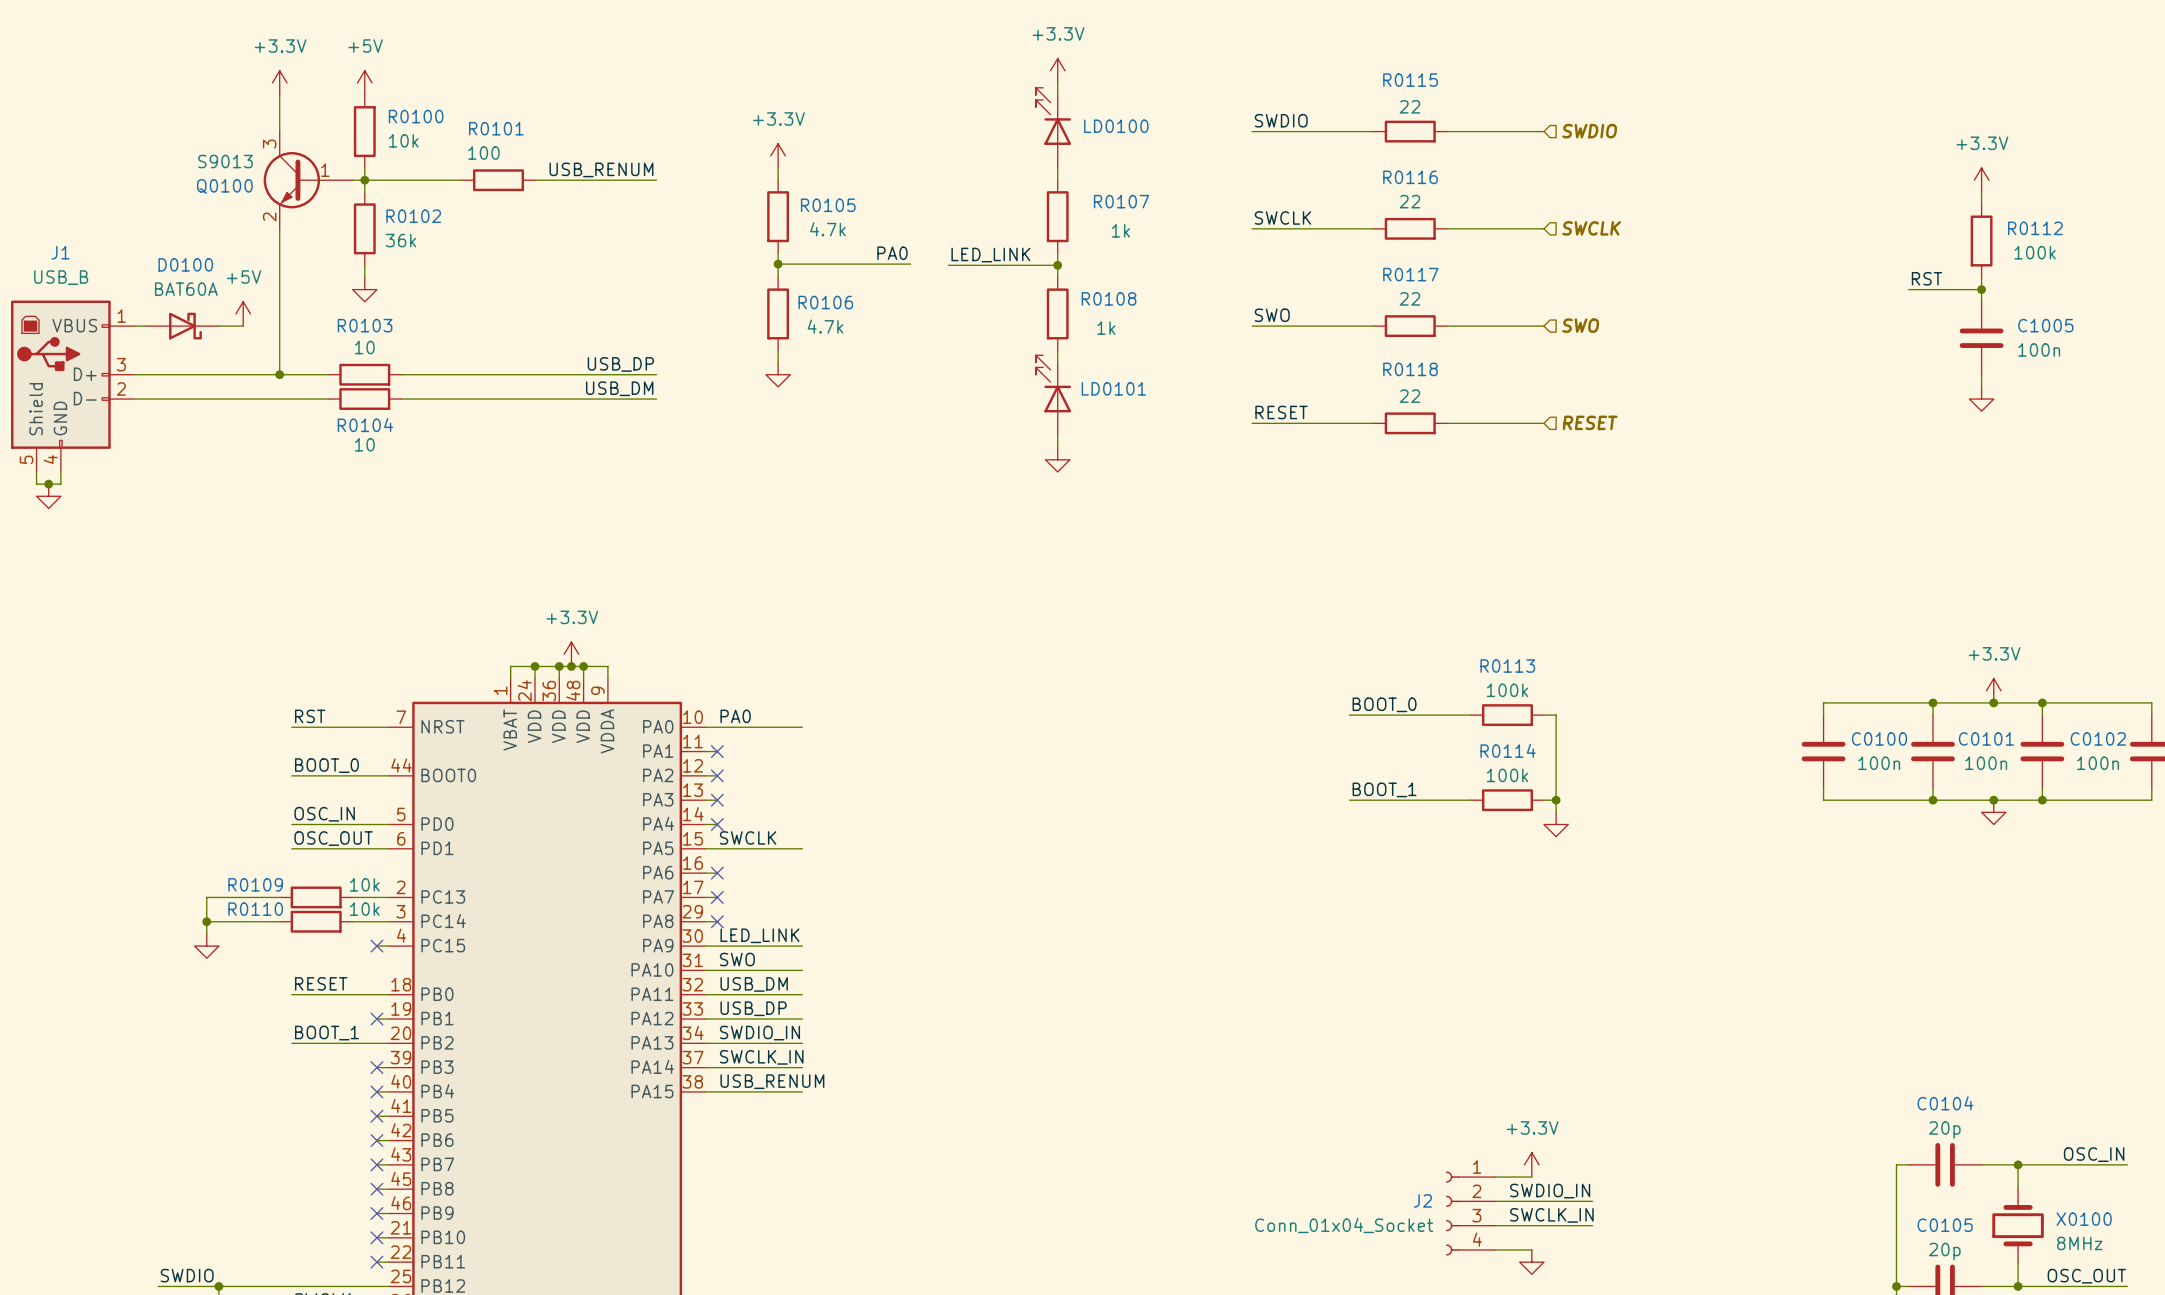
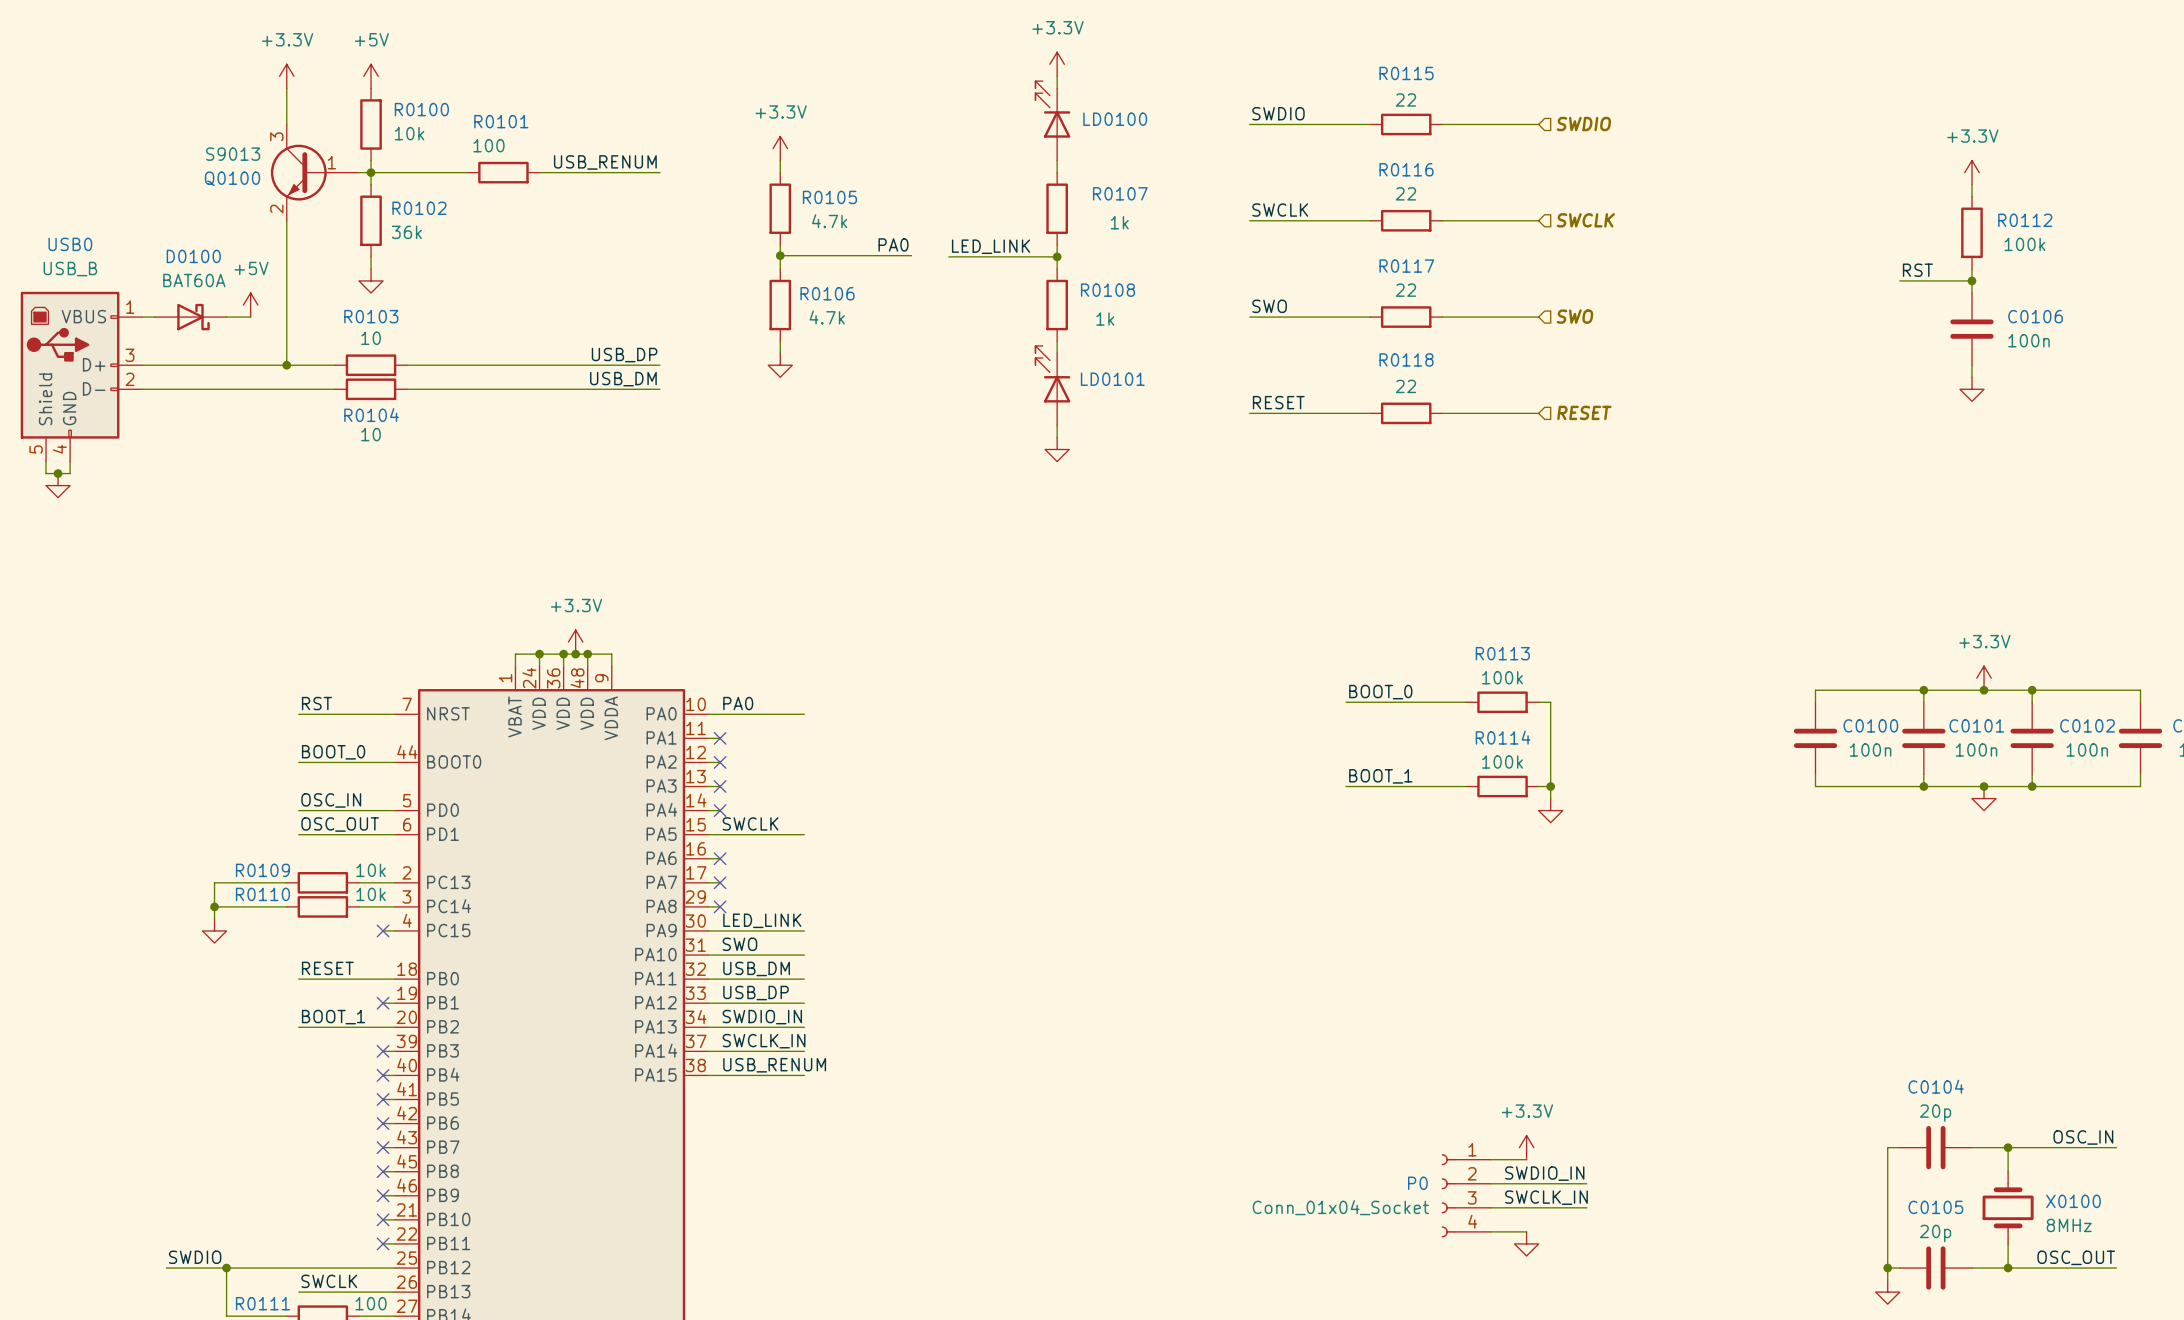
J1 name: J1 (60, 252) -> USB0 (70, 244)
C1005 name: C1005 (2045, 325) -> C0106 (2035, 316)
J2 name: J2 (1422, 1200) -> P0 (1417, 1183)

